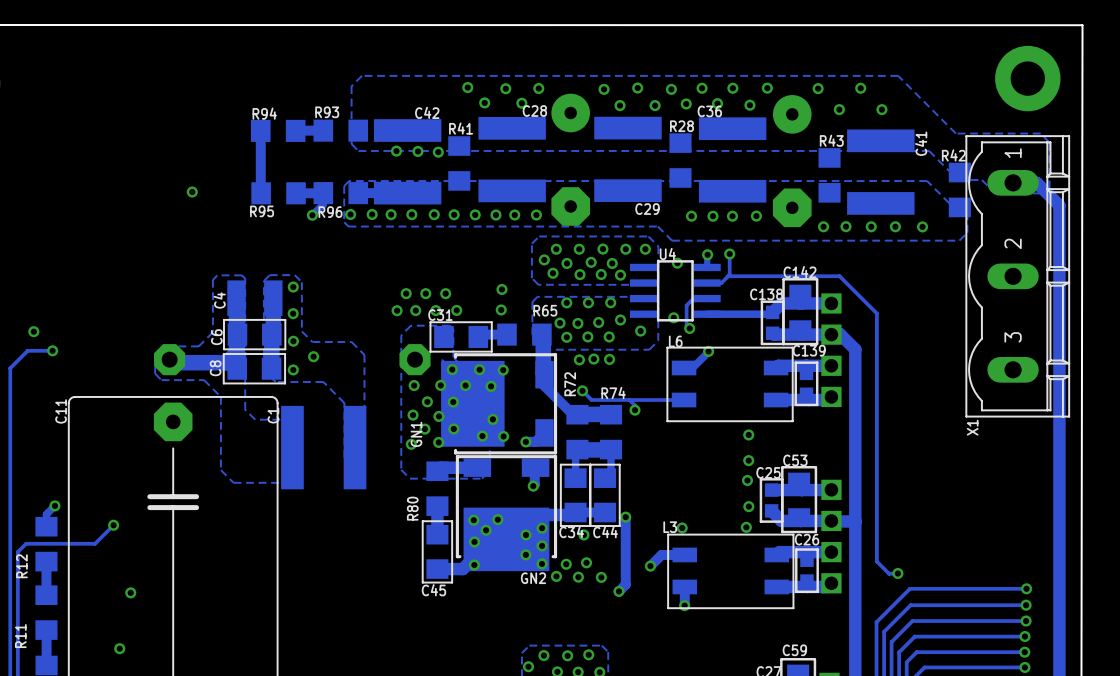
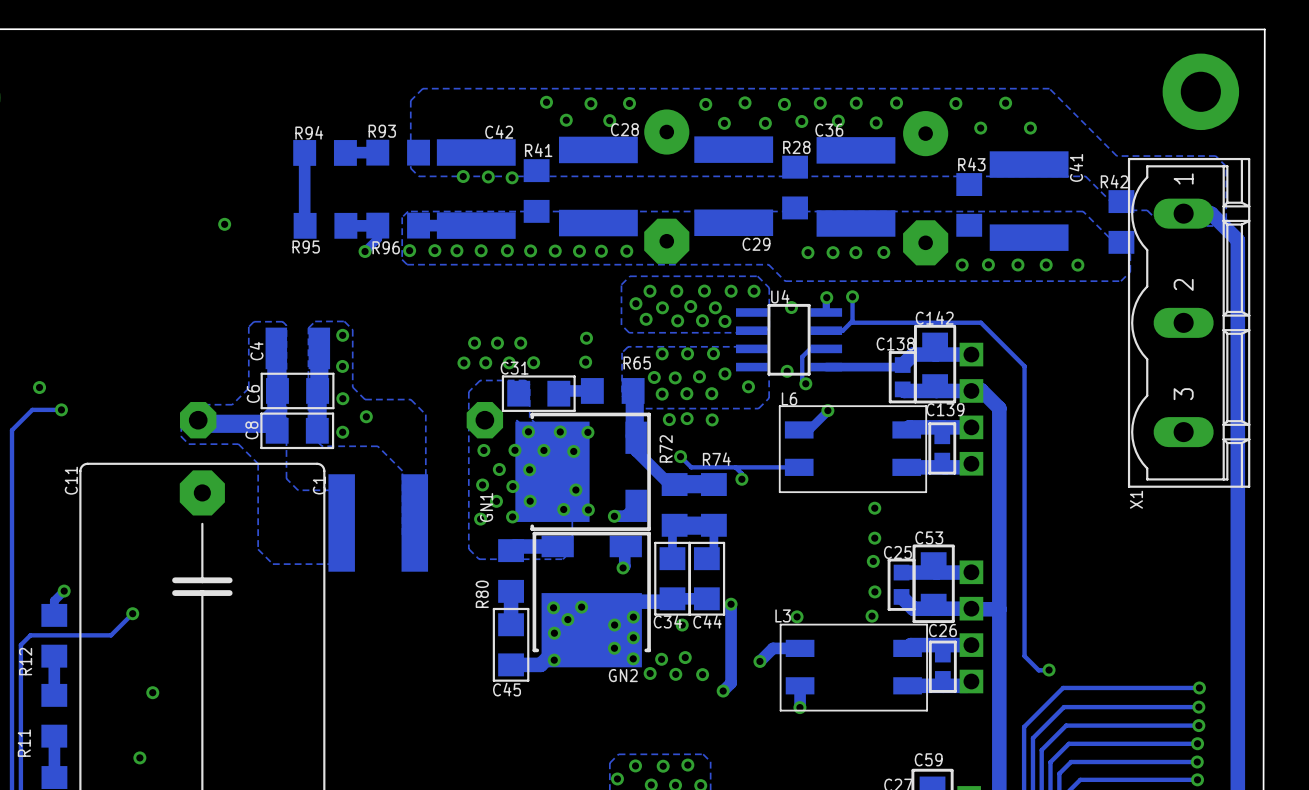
via: none -> (687, 418)
via: none -> (669, 419)
via: (579, 359) -> none
via: (593, 359) -> none

